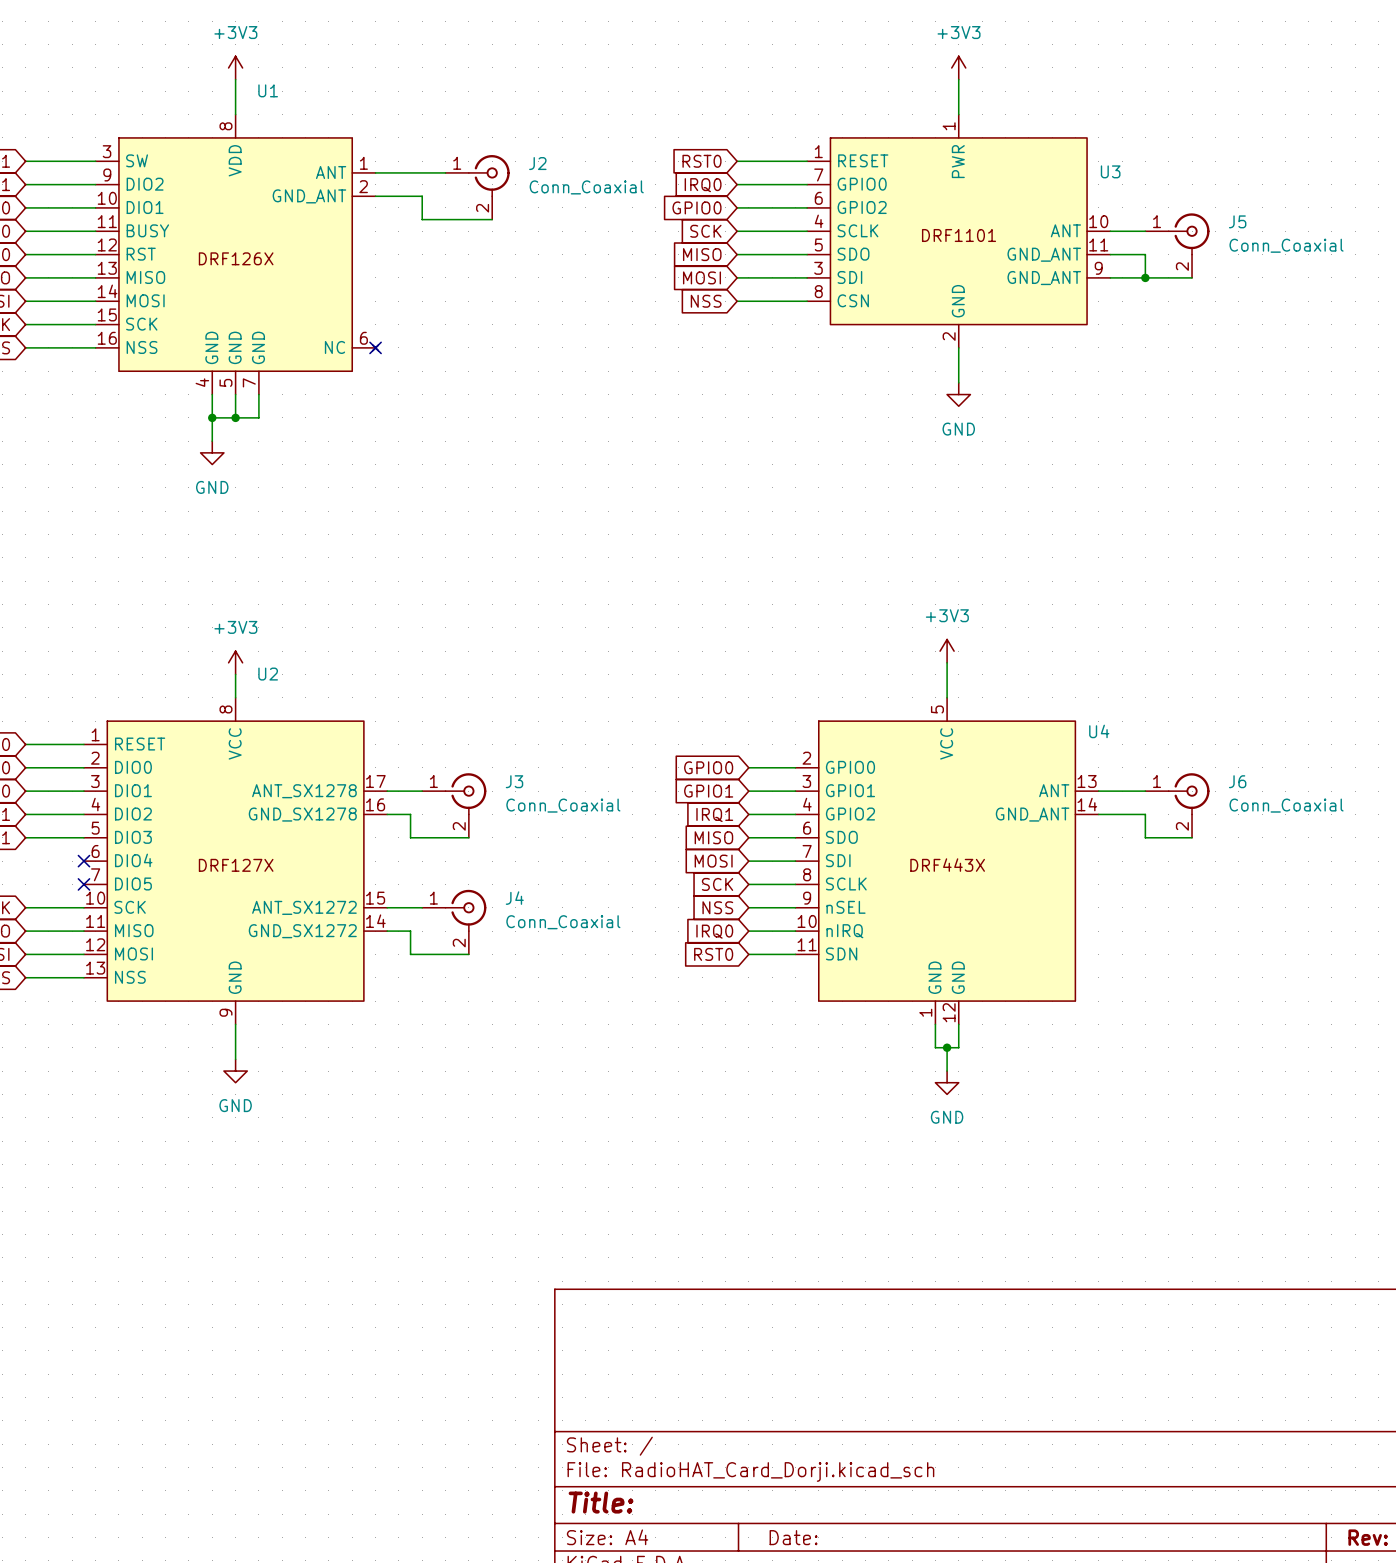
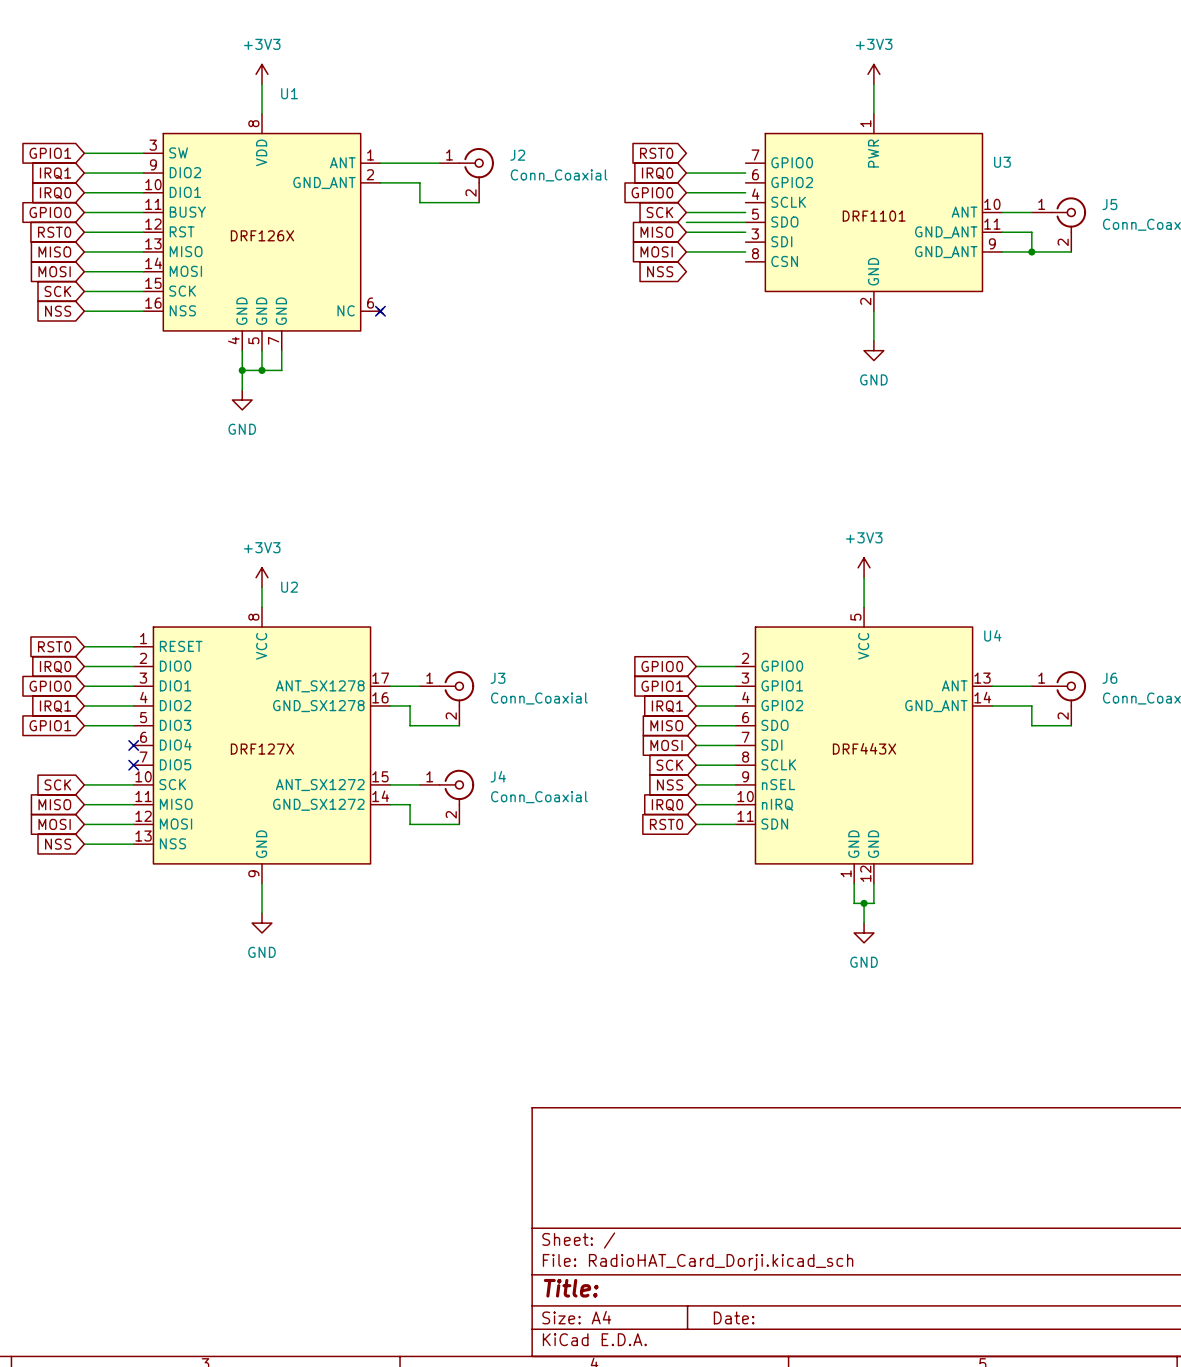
U3 symbol: [807, 114, 1111, 348] -> [745, 113, 1003, 312]
wire: (737, 161) (807, 161) -> none
wire: (737, 301) (807, 301) -> (686, 222) (745, 222)

